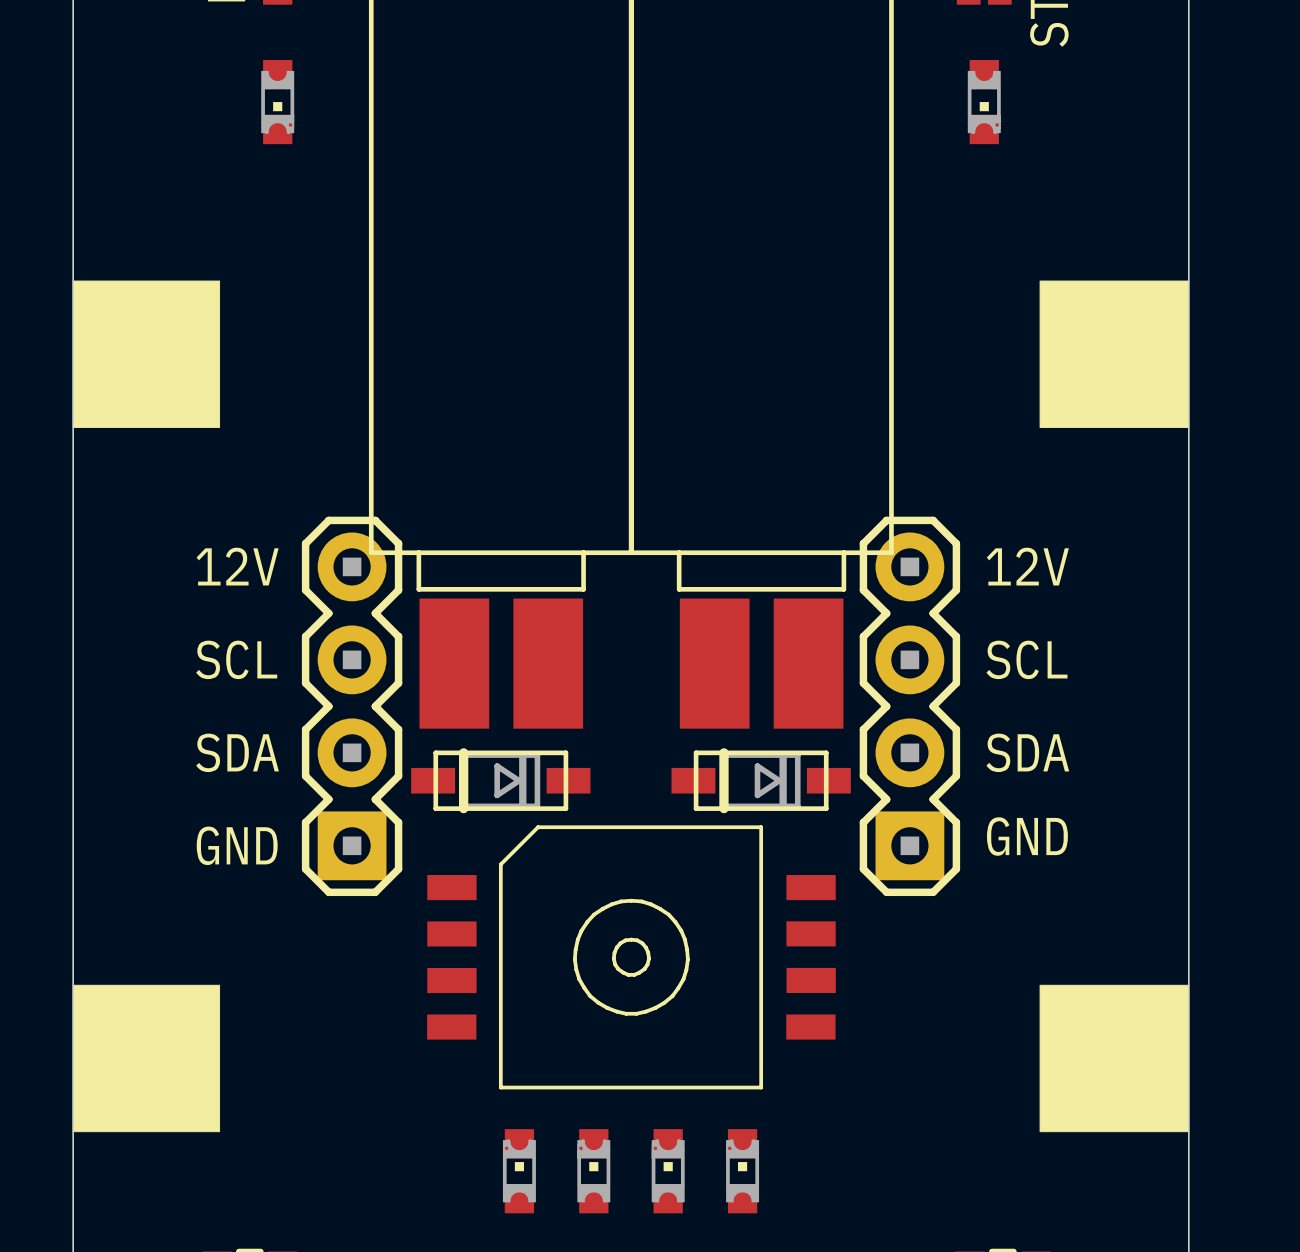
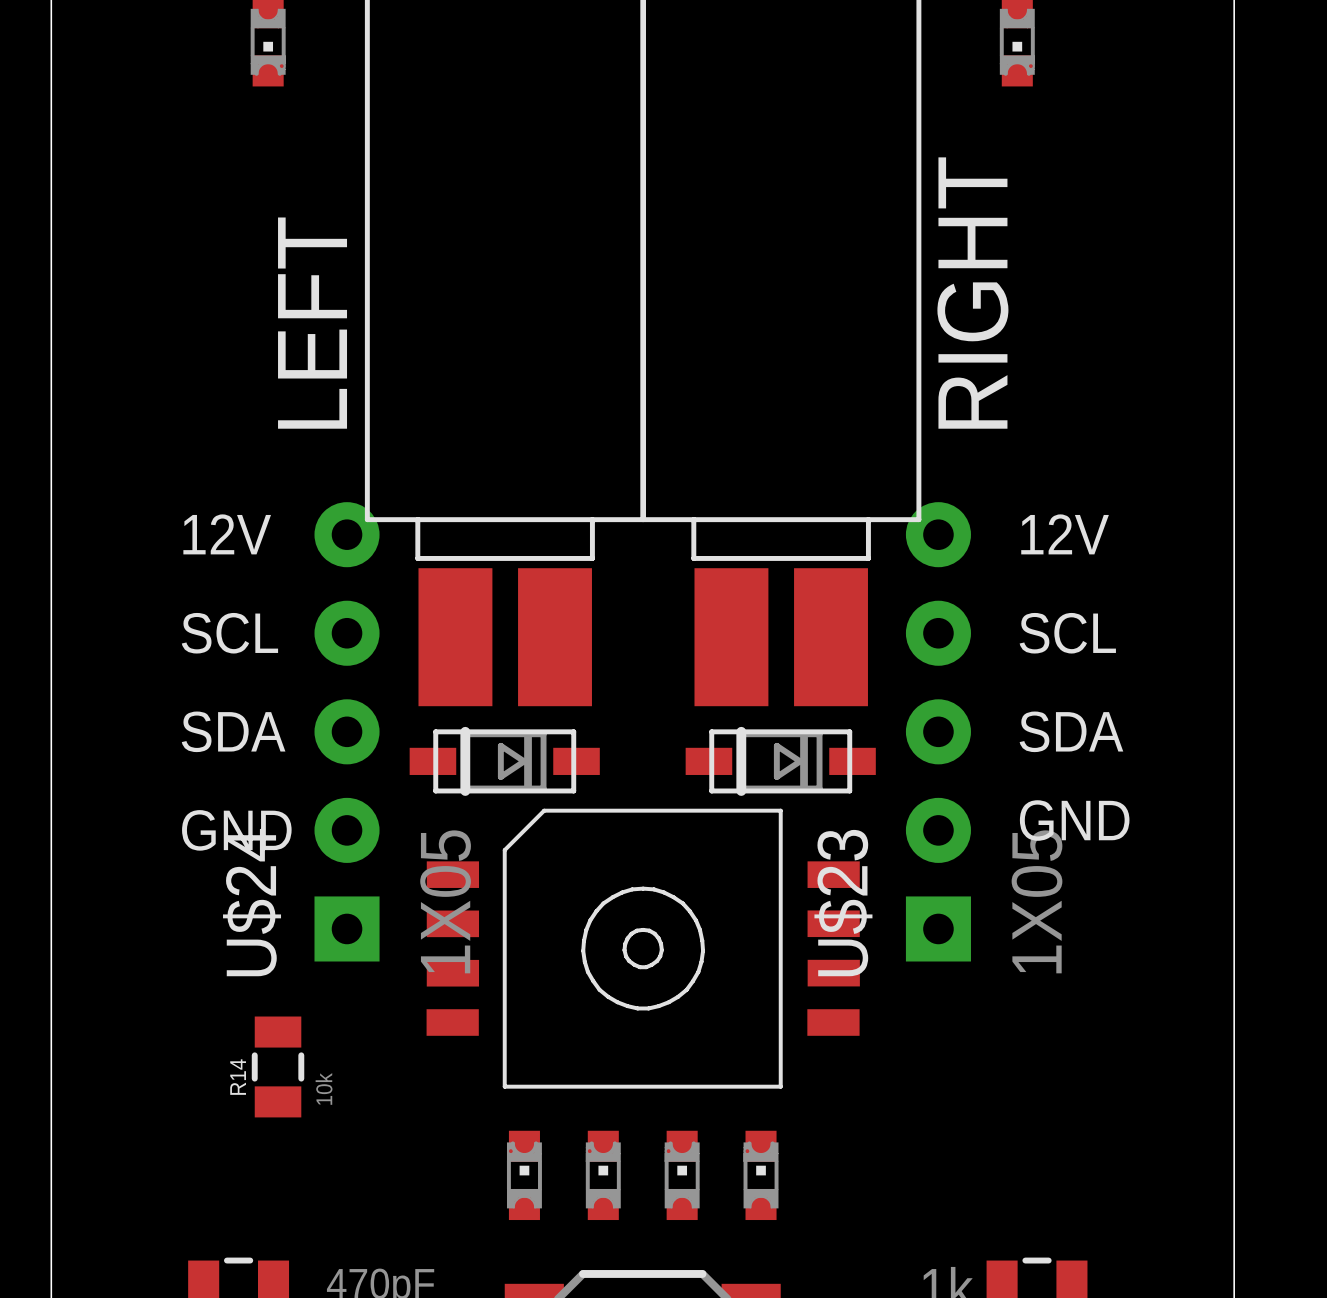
drawing: [72, 280, 221, 428] -> none
drawing: [1039, 280, 1190, 428] -> none
text: none -> RIGHT (972, 293)
text: none -> LEFT (312, 323)
part: (352, 706) -> none
part: (909, 706) -> none
U$24: none -> 1X05 (347, 731)
U$23: none -> 1X05 (938, 731)
drawing: [72, 984, 221, 1133] -> none
drawing: [1039, 984, 1190, 1133] -> none
R14: none -> 10k (278, 1066)

